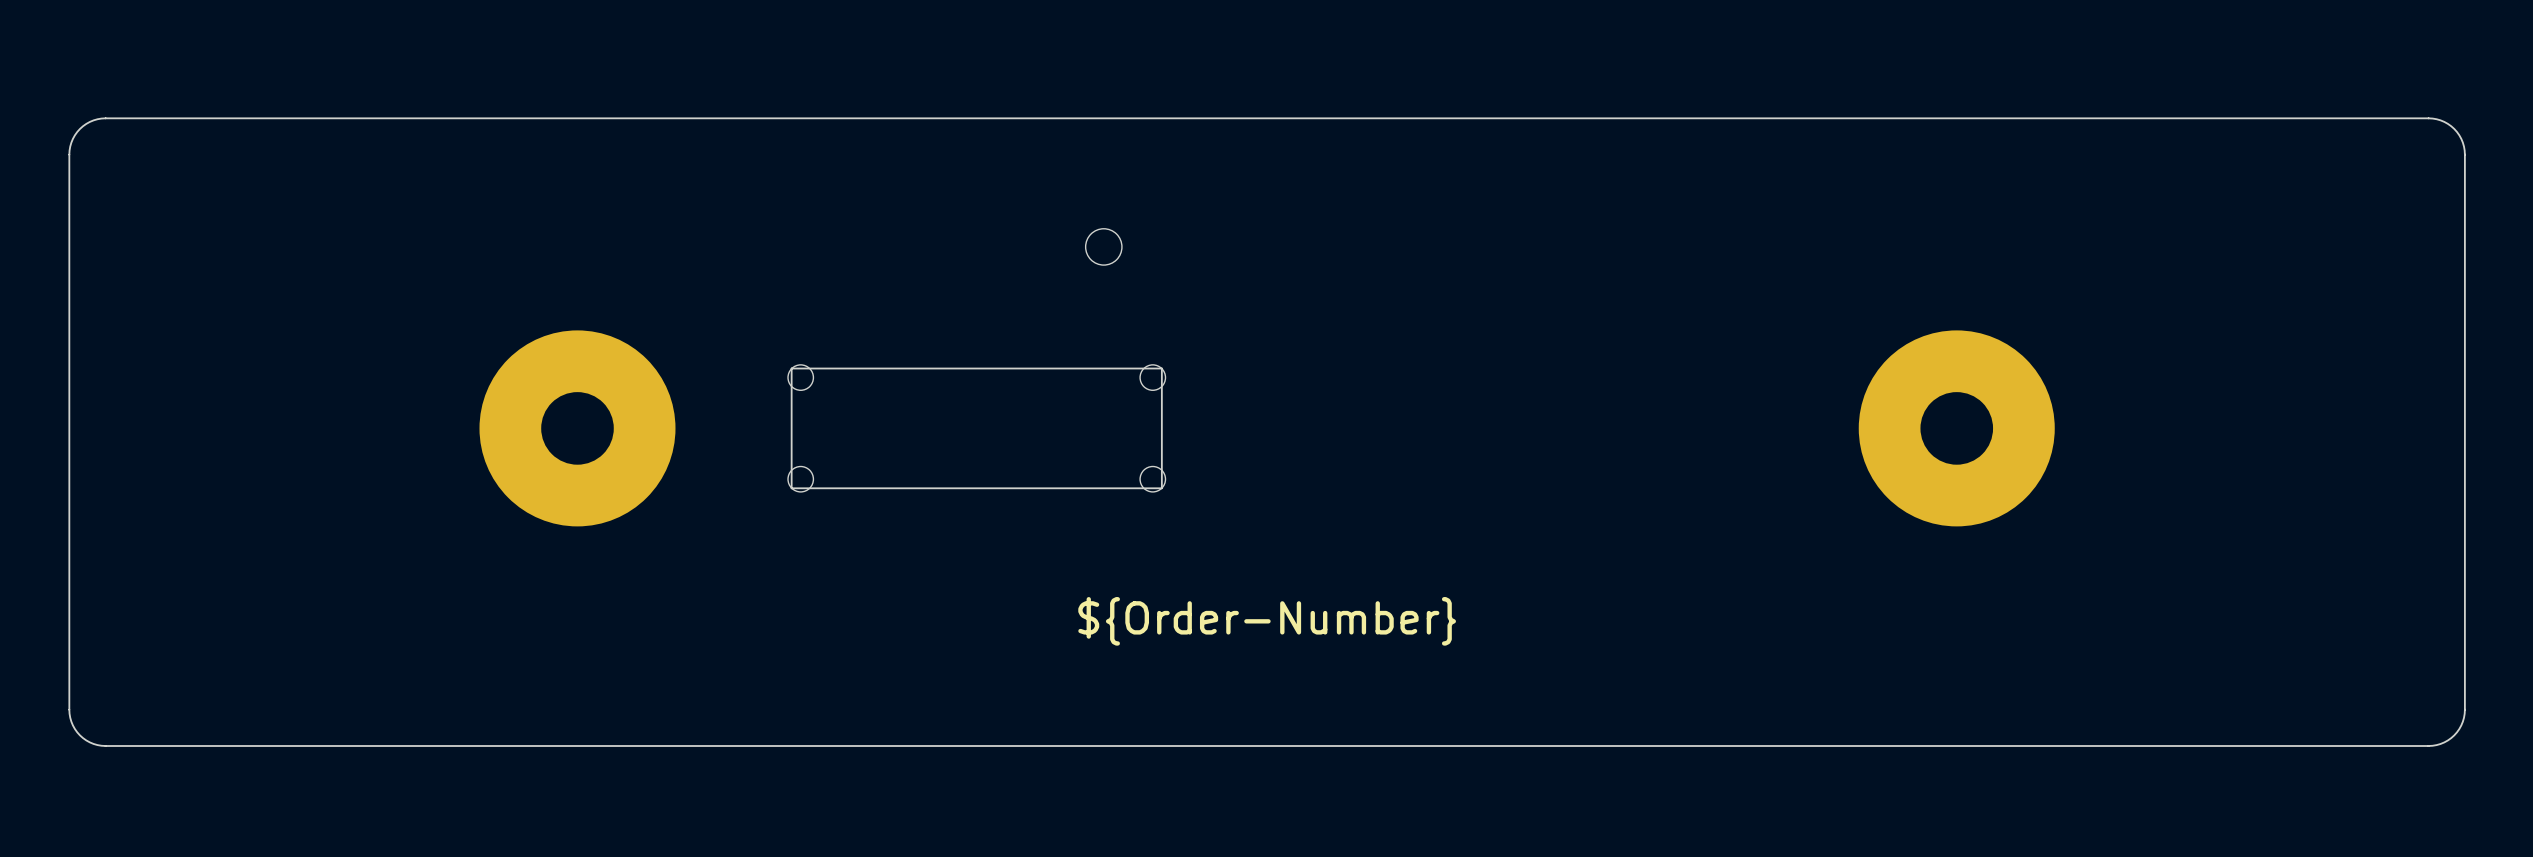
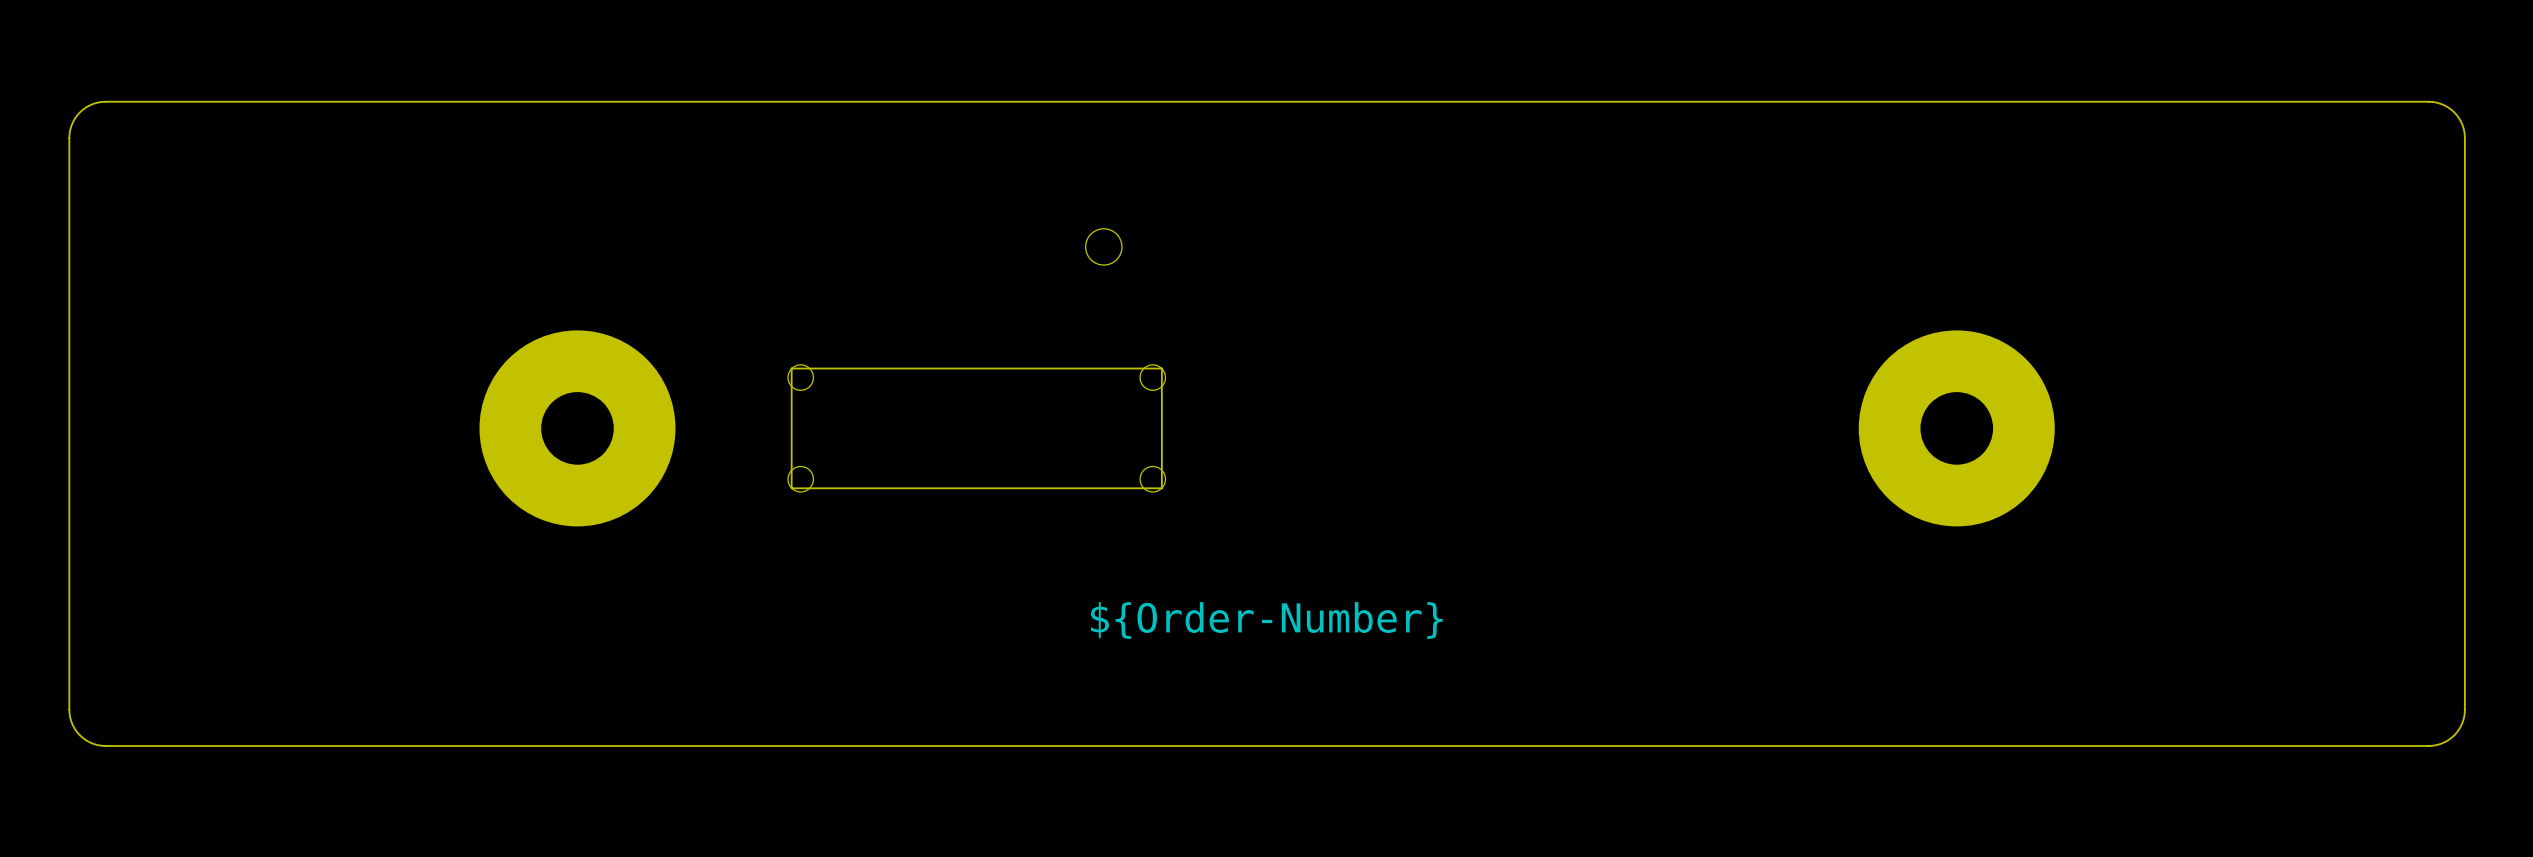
board edge: (2464, 154) (2461, 138) (2454, 128) (2444, 121) (2428, 118) (105, 118) (89, 121) (79, 128) (72, 138) (69, 154) -> (2464, 154) (2464, 133) (2459, 118) (2447, 107) (2428, 101) (105, 101) (89, 105) (74, 118) (69, 133) (69, 154)

